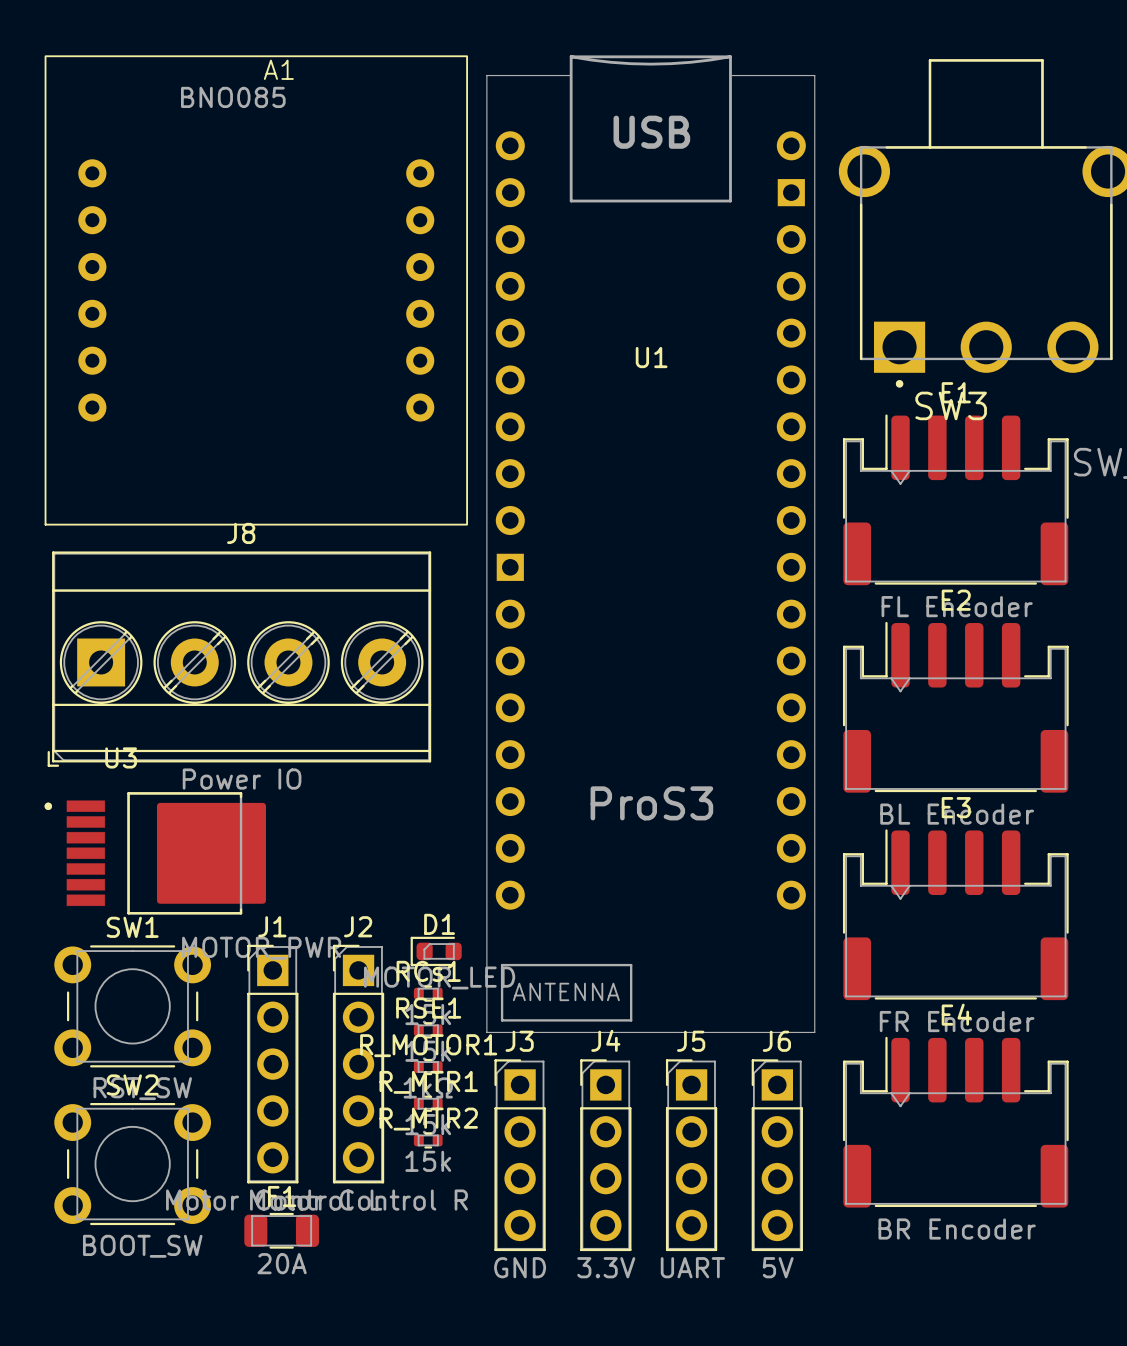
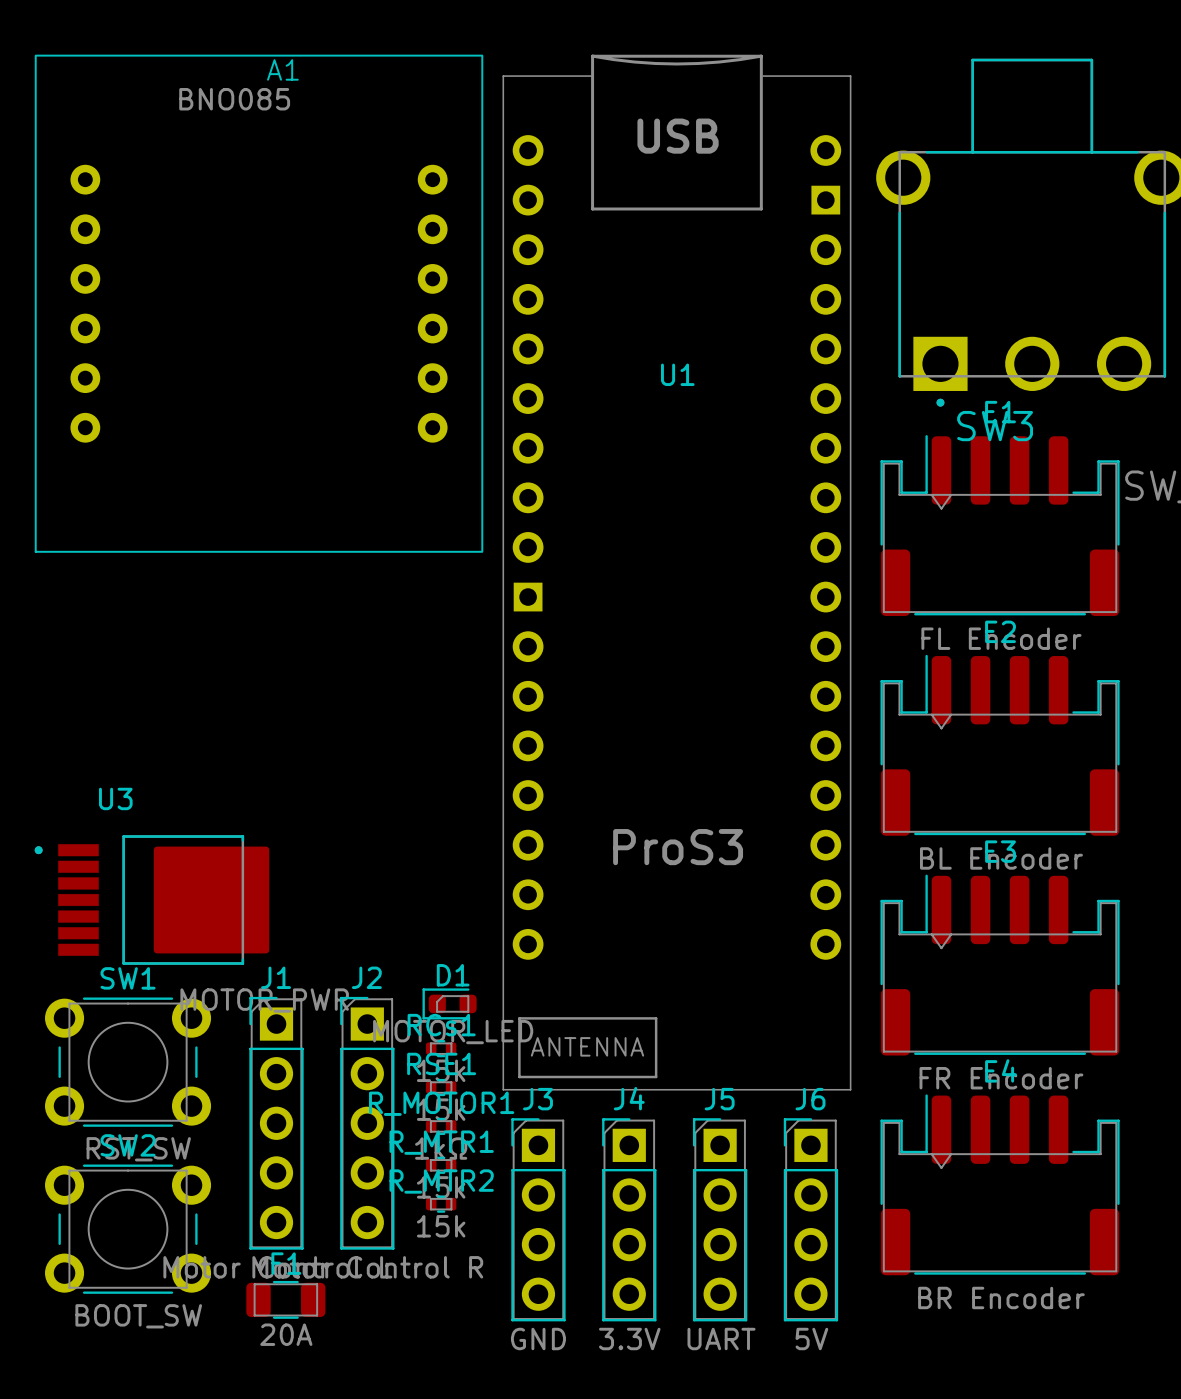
J8: Power IO (239, 659) -> none

